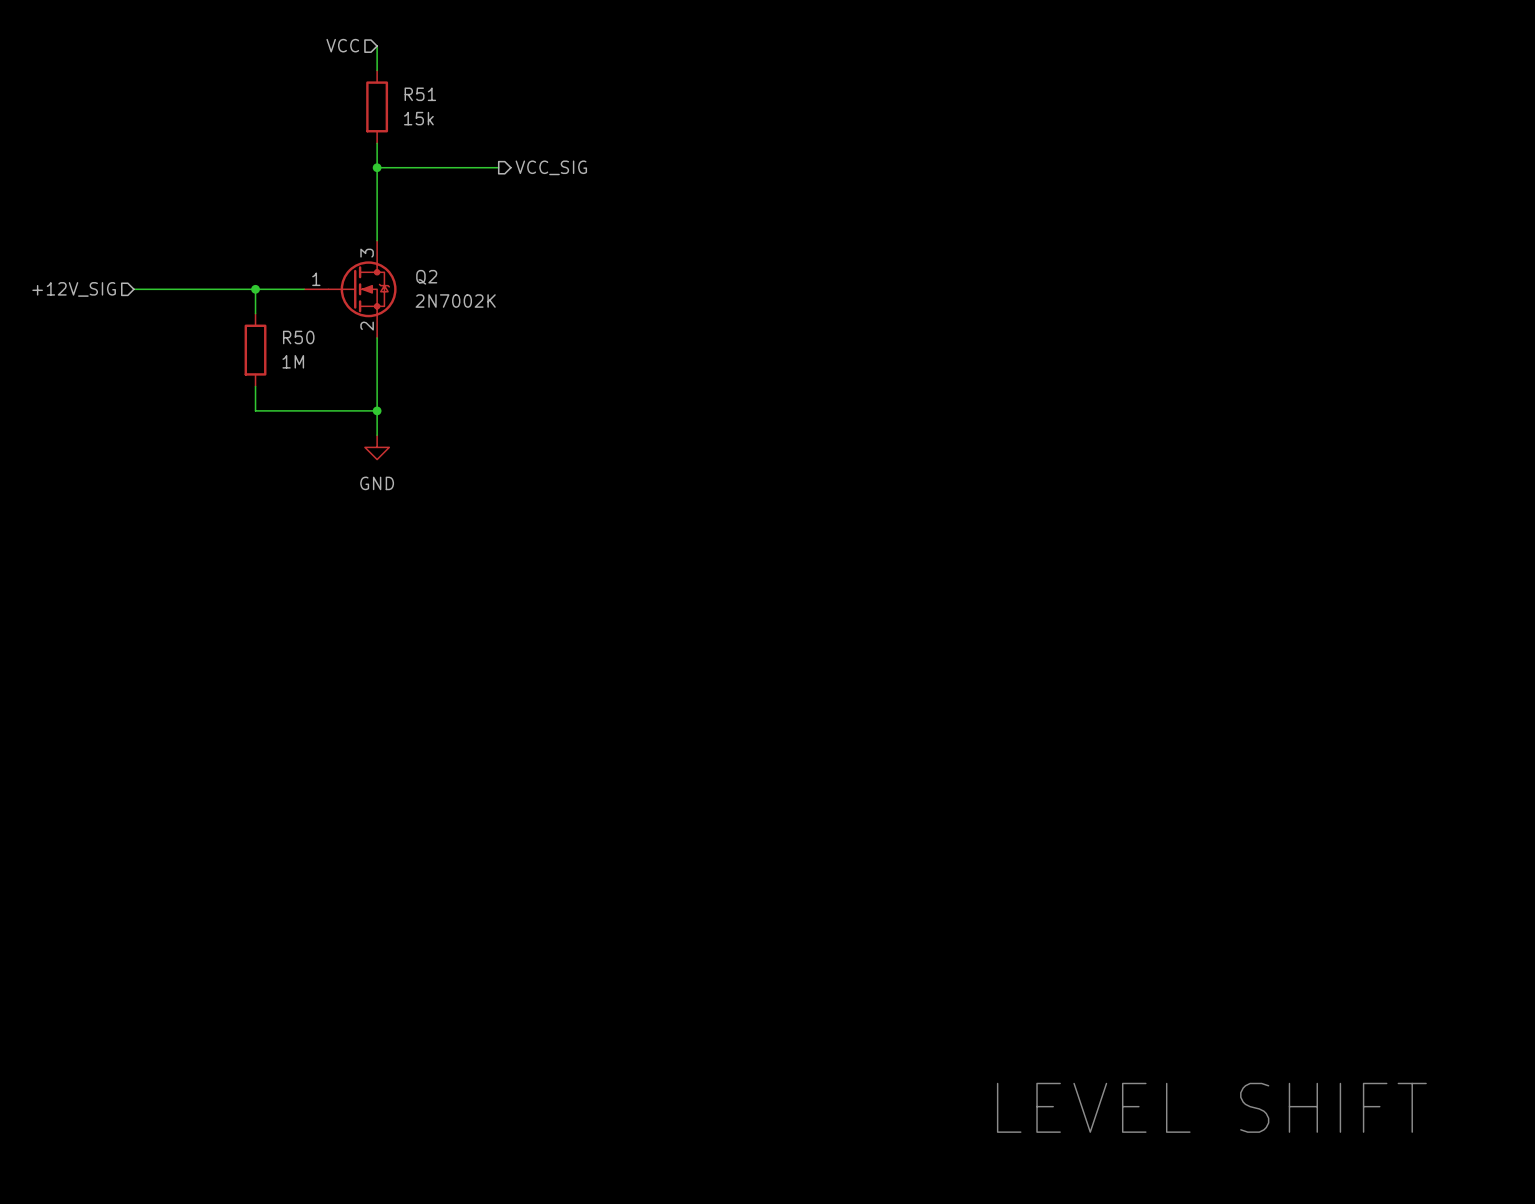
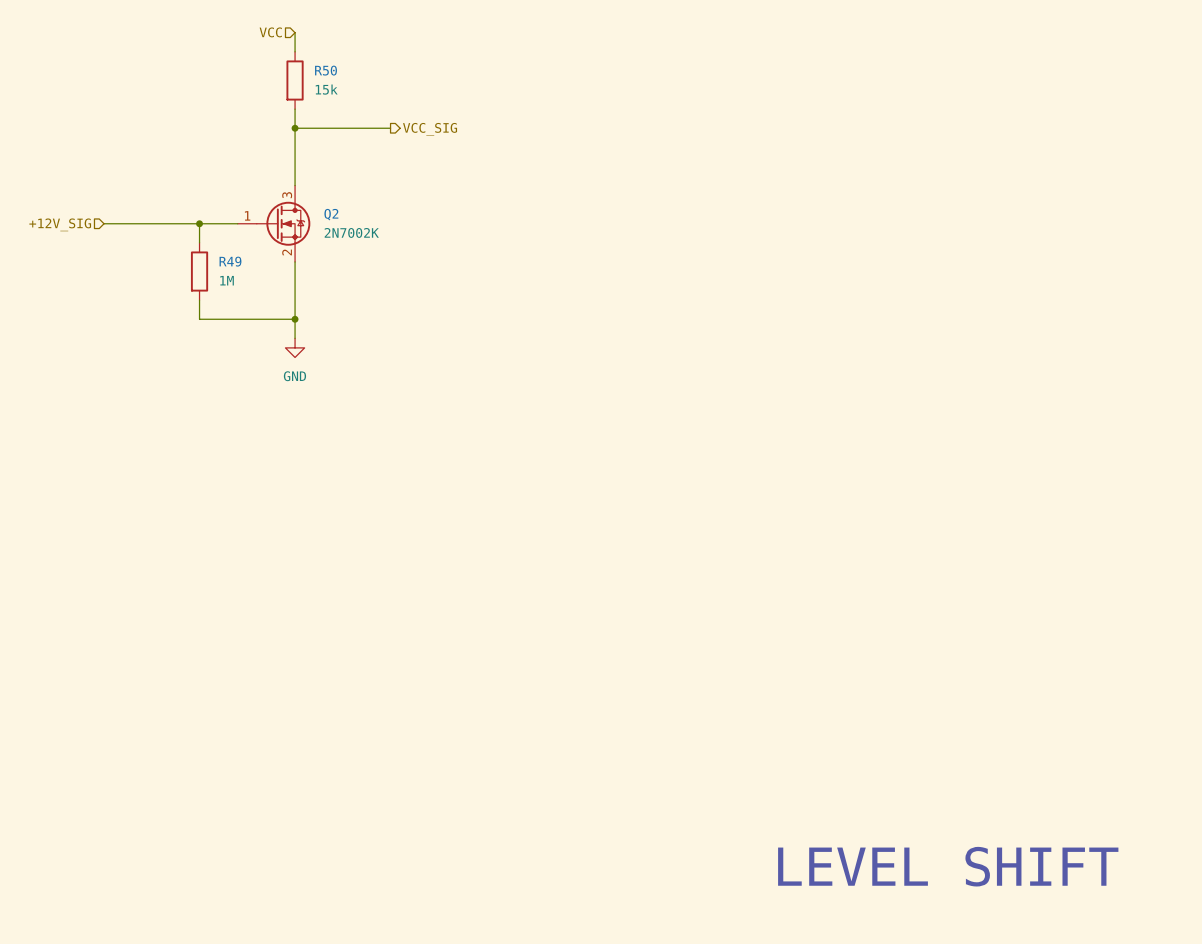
R51 name: R51 (420, 94) -> R50 (326, 70)
R50 name: R50 (298, 337) -> R49 (230, 261)

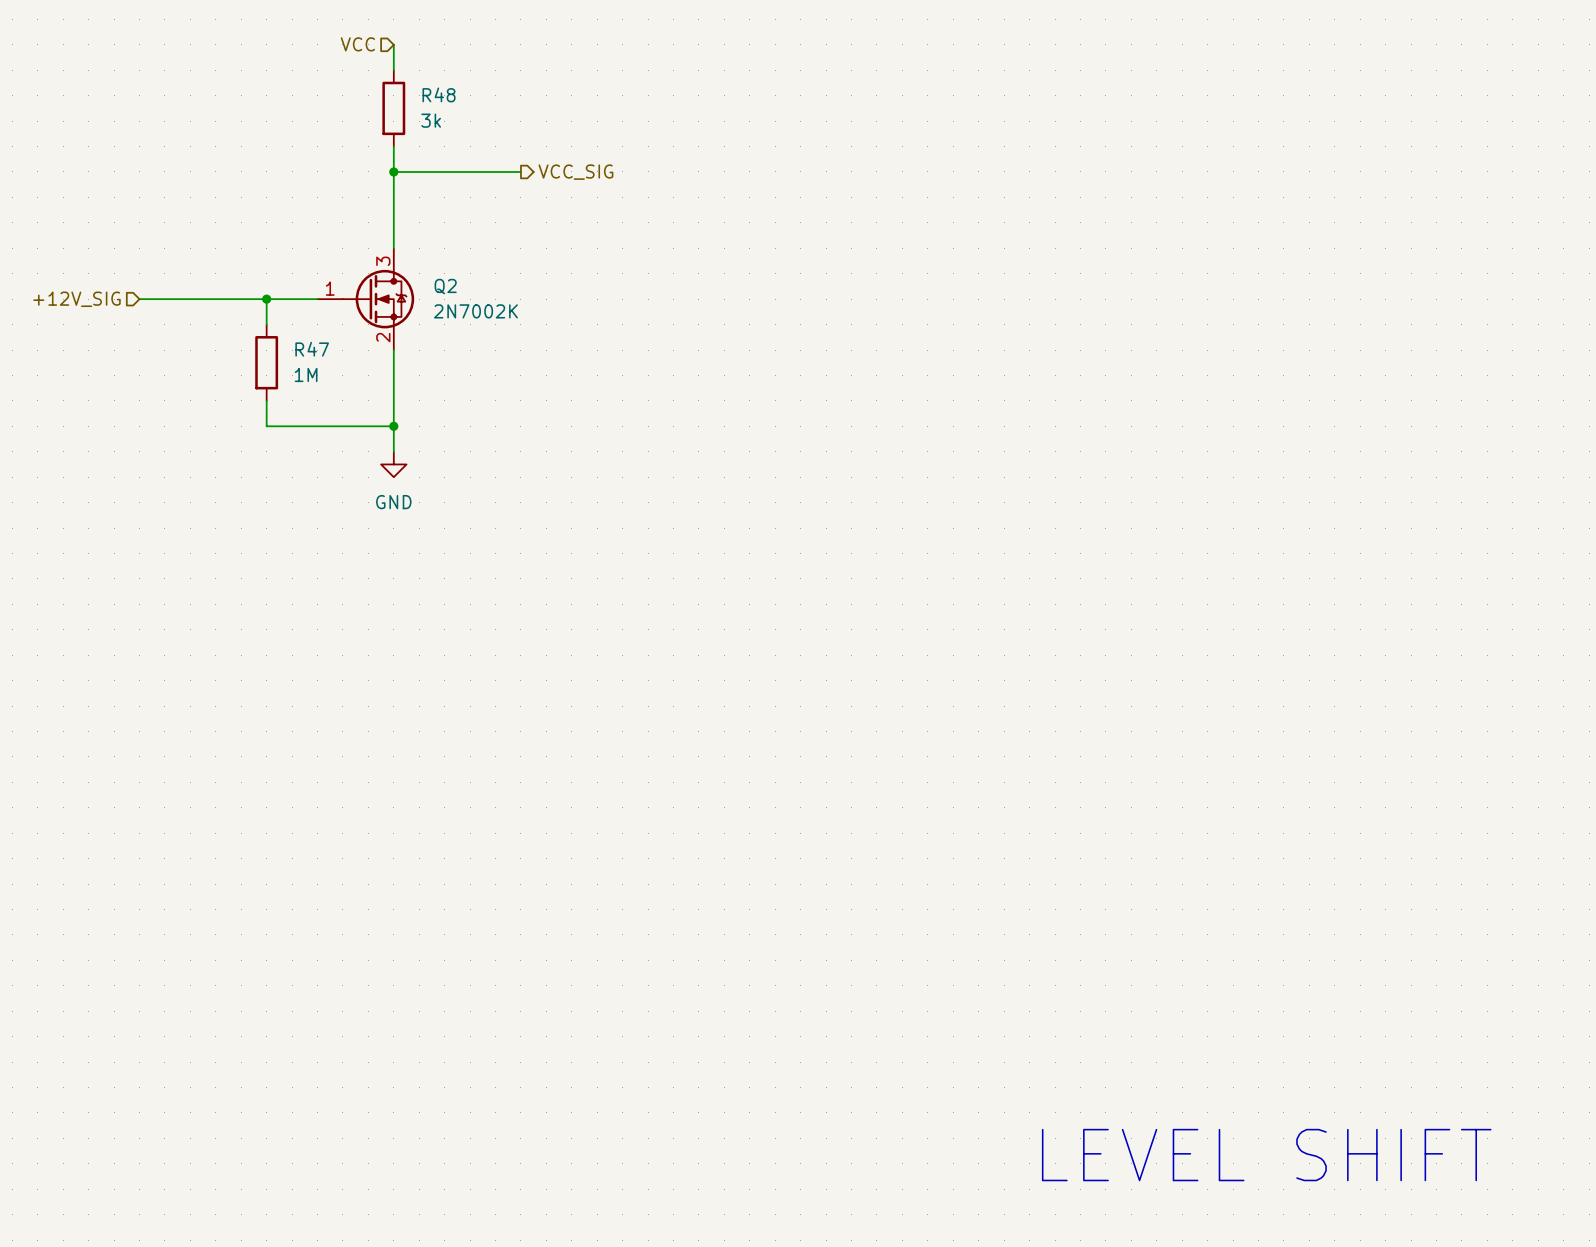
R50 name: R50 (326, 70) -> R48 (439, 94)
R50 value: 15k (326, 89) -> 3k (431, 120)
R49 name: R49 (230, 261) -> R47 (312, 349)

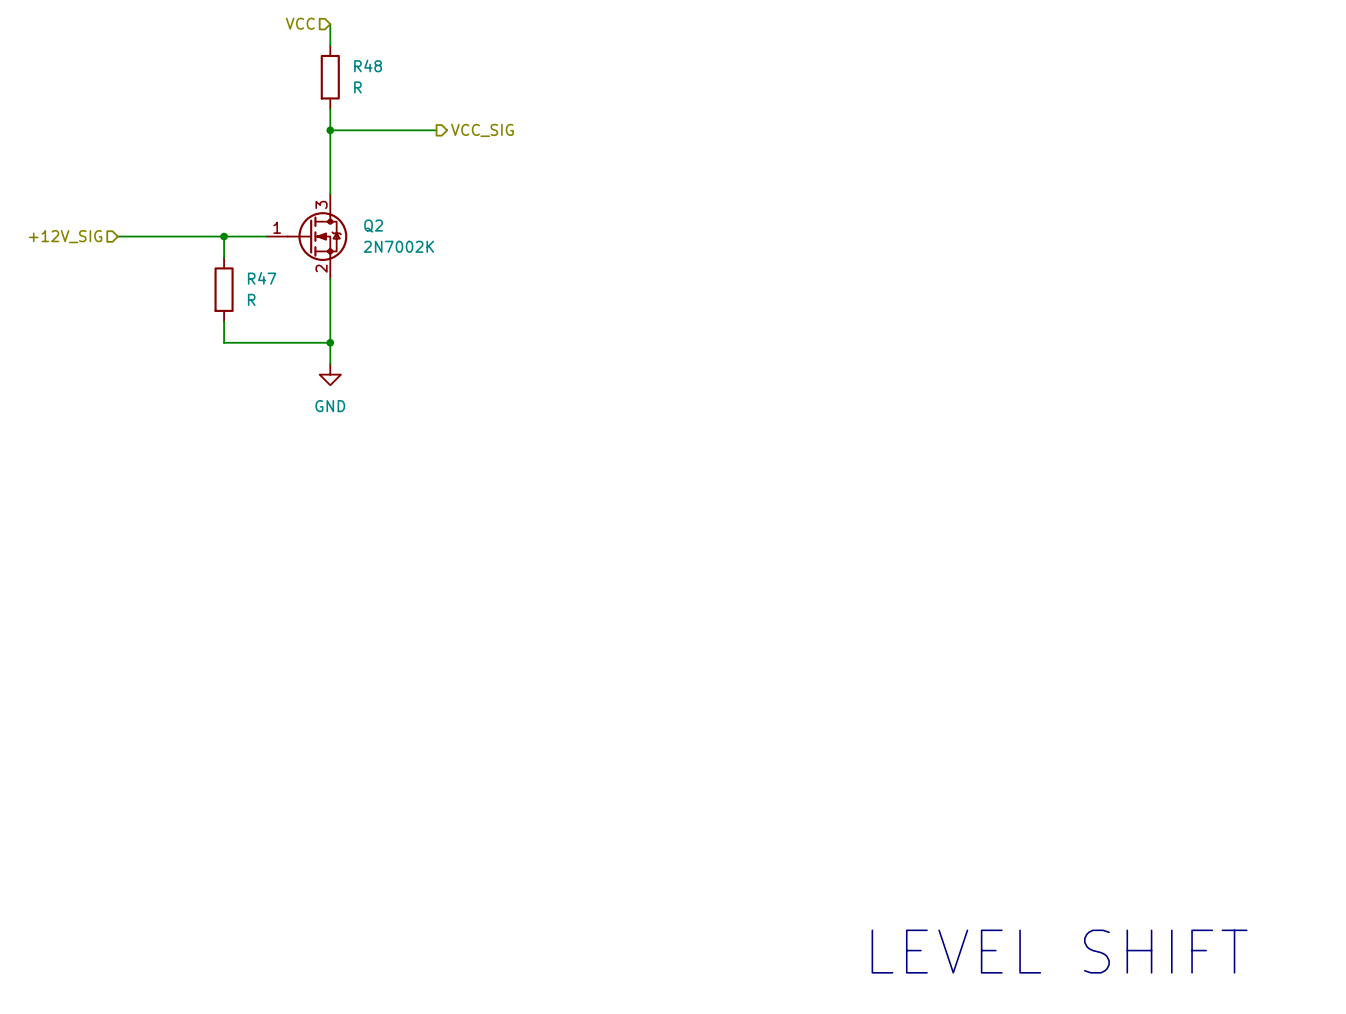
R48 value: 3k (431, 120) -> R (357, 87)
R47 value: 1M (306, 374) -> R (251, 299)

